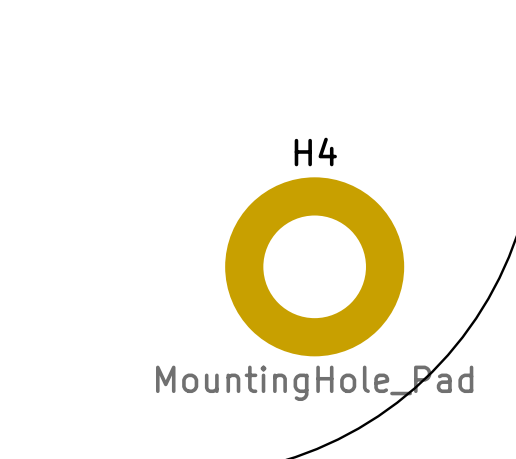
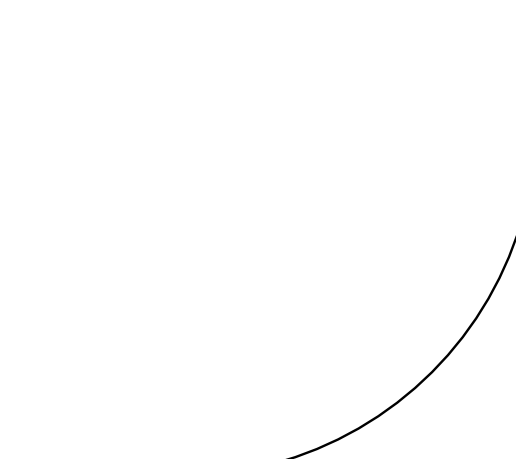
H4: MountingHole_Pad (314, 266) -> none

